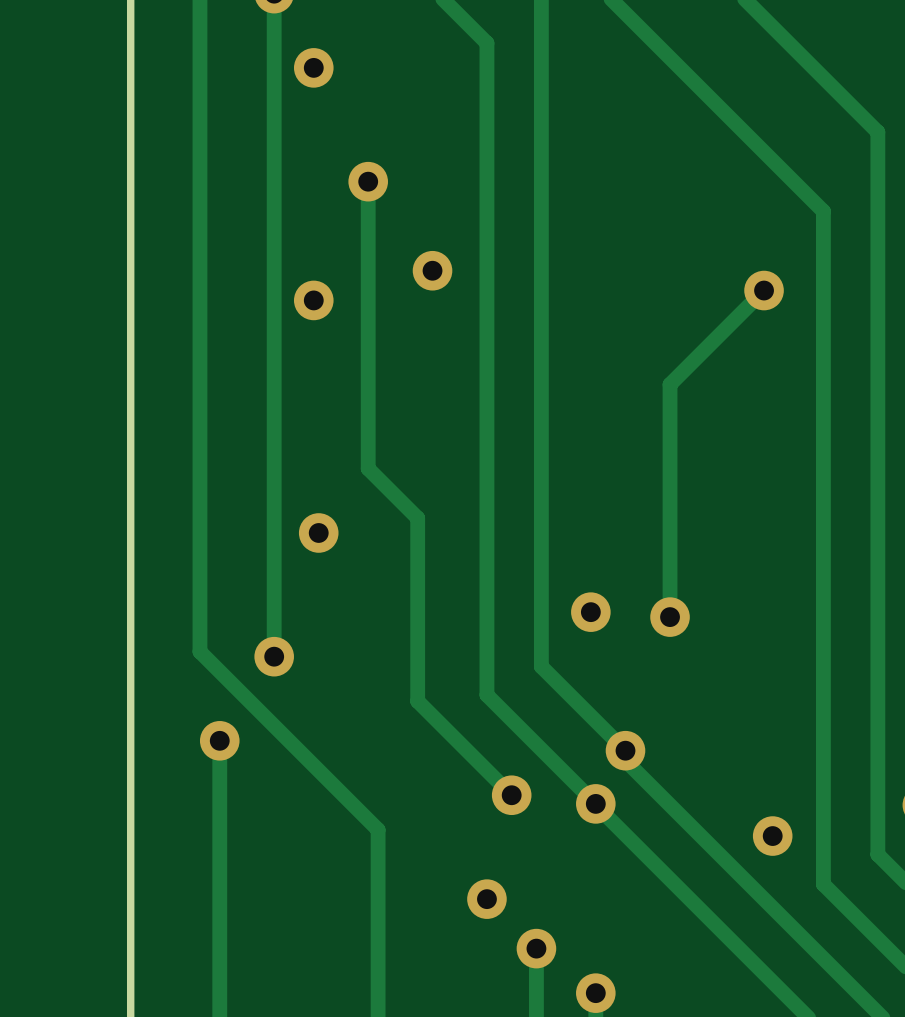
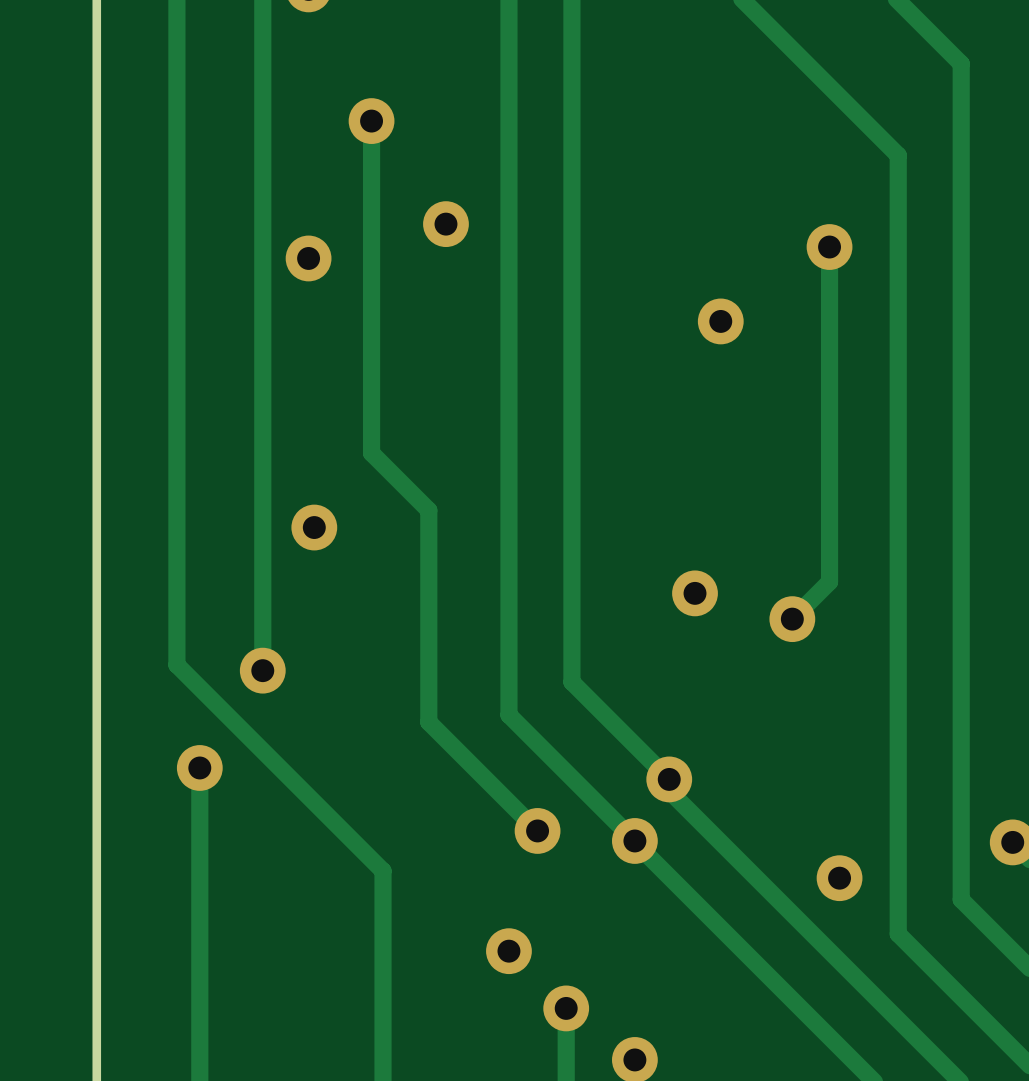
track: (764, 290) (670, 384) (670, 617) -> (829, 247) (829, 581) (792, 619)
via: none -> (720, 321)
via: (590, 612) -> none
via: none -> (792, 619)
via position: (670, 617) -> (695, 593)

